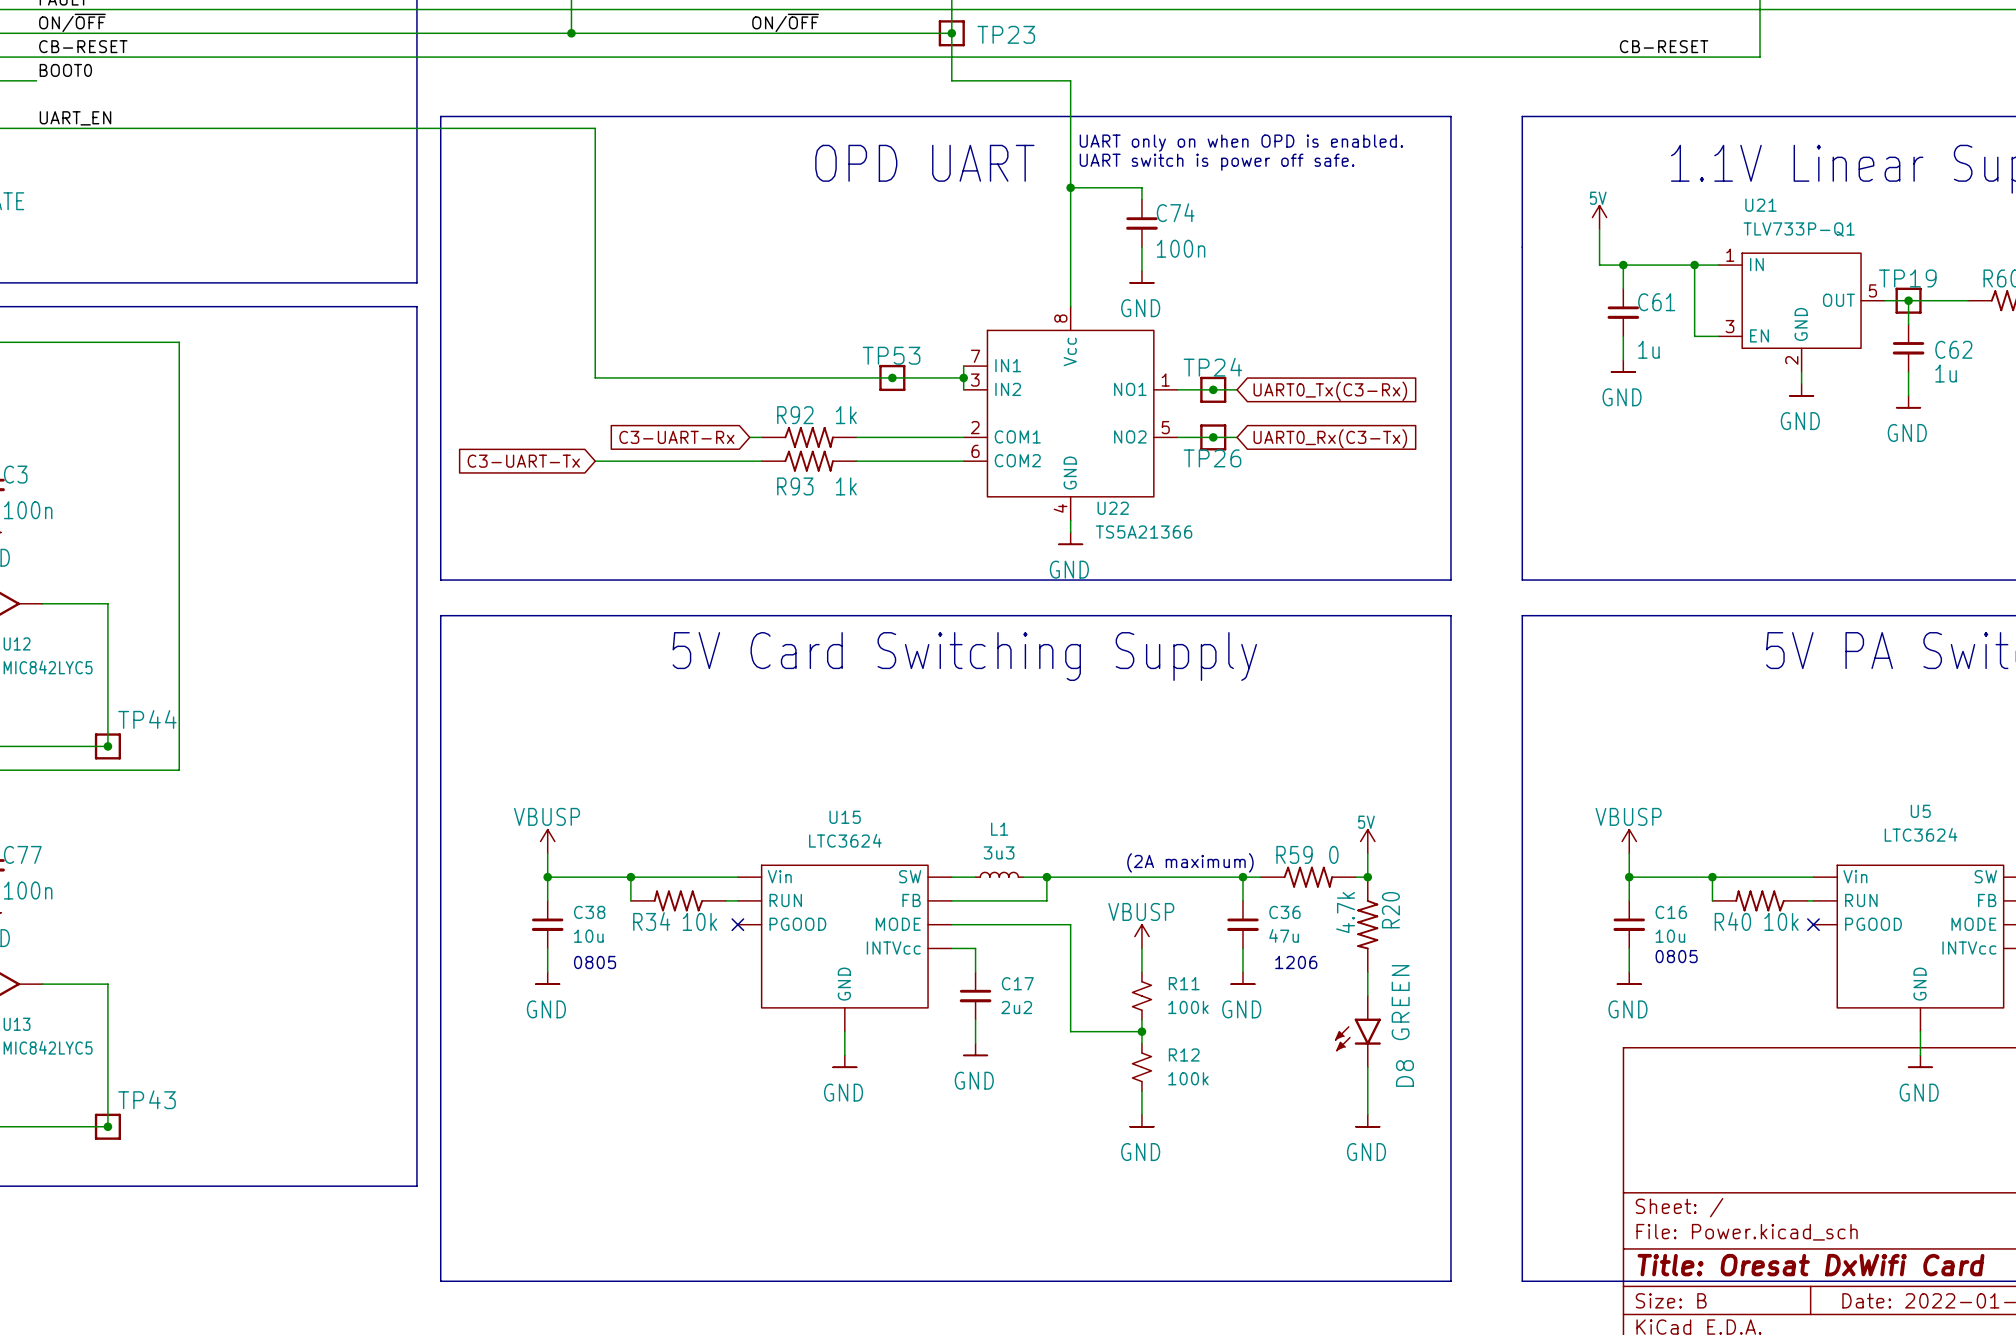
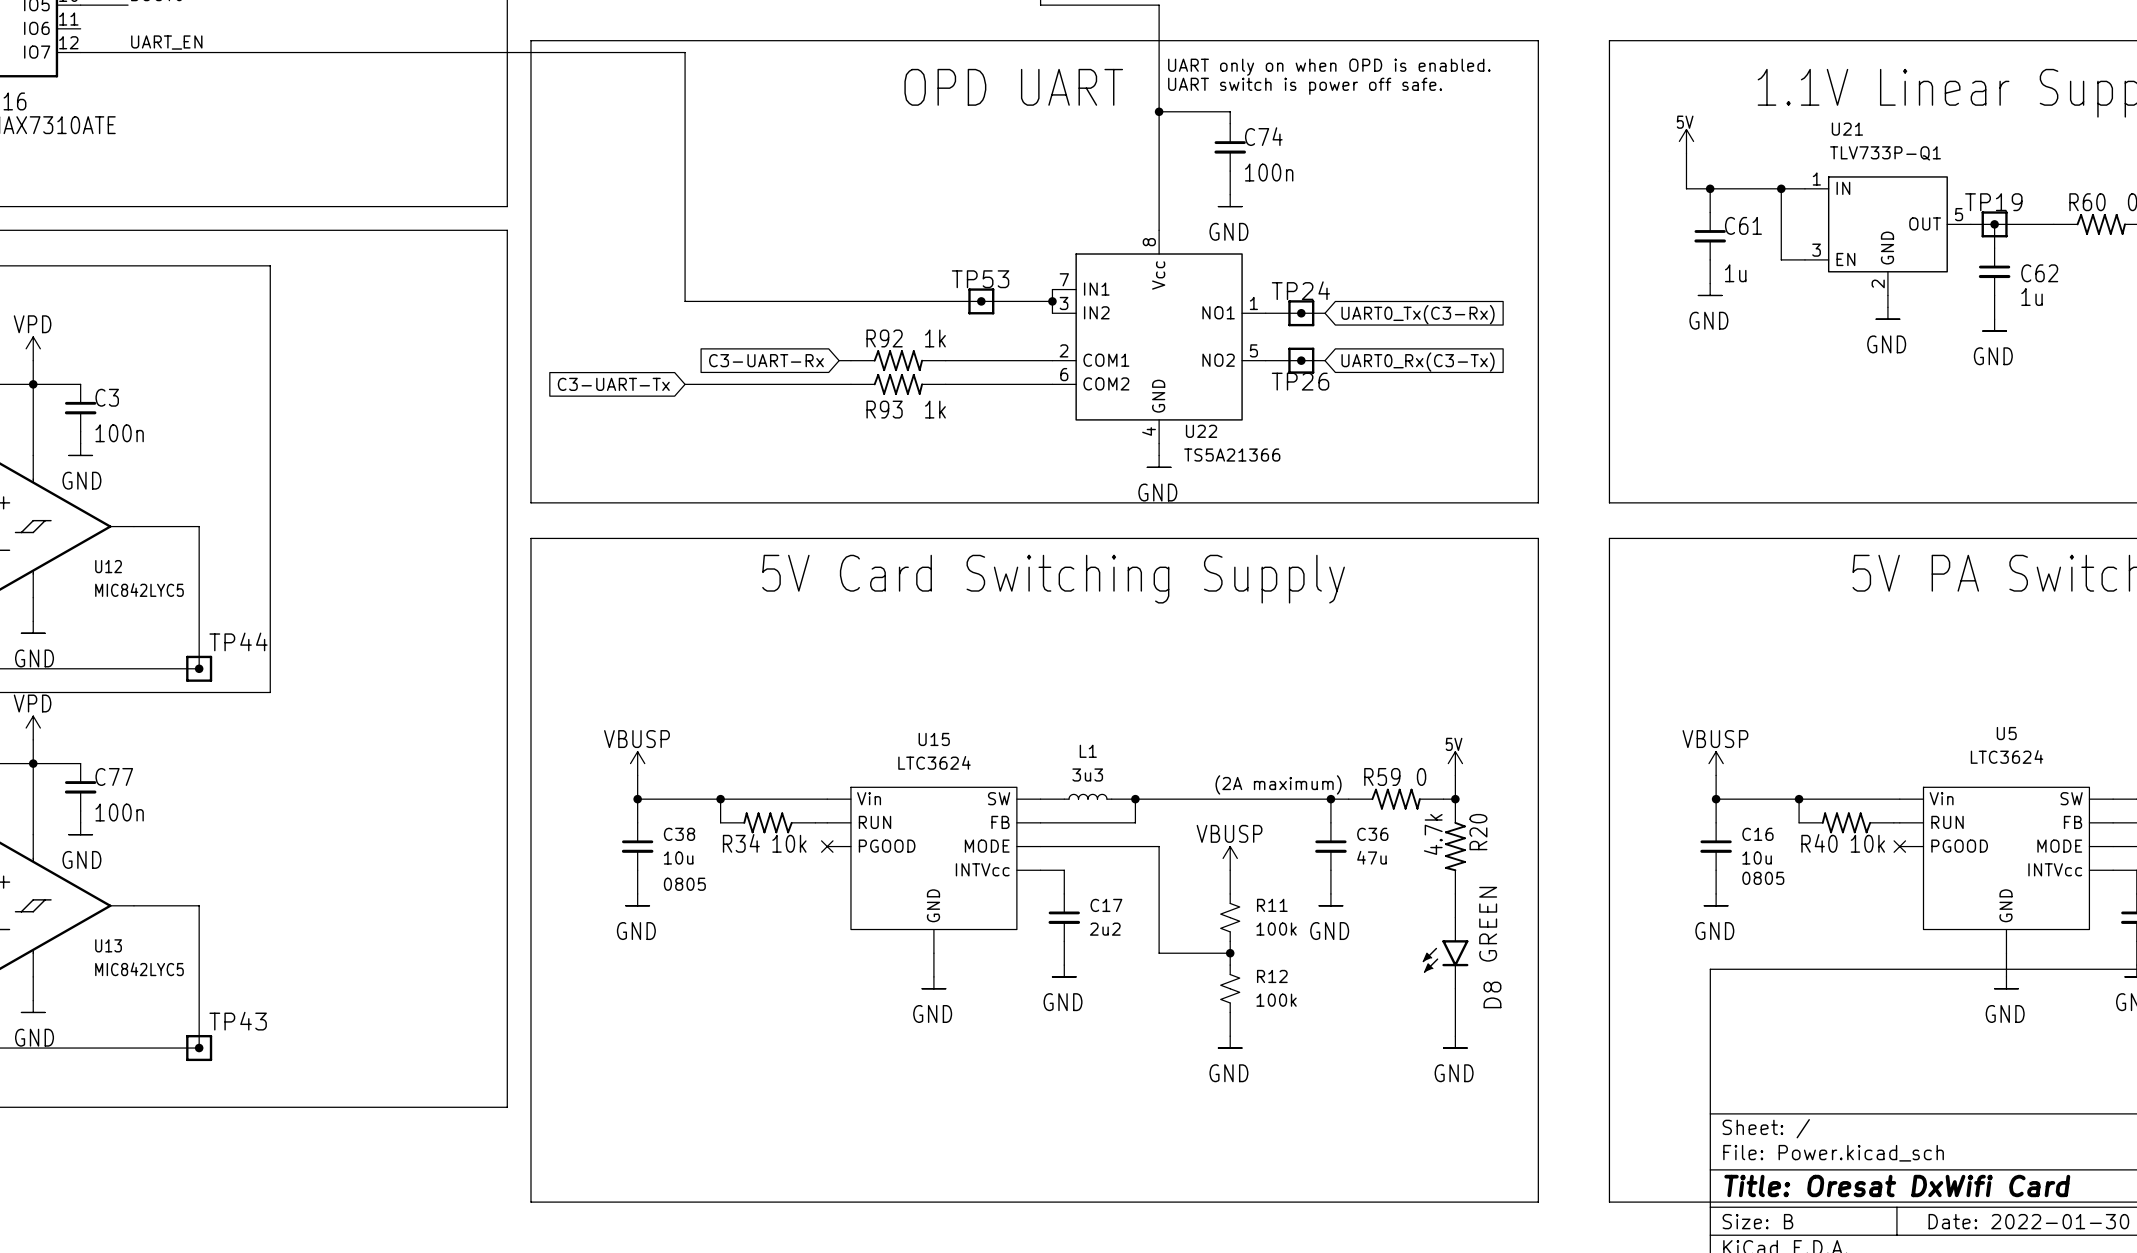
text: 1206 (1296, 962) -> none

